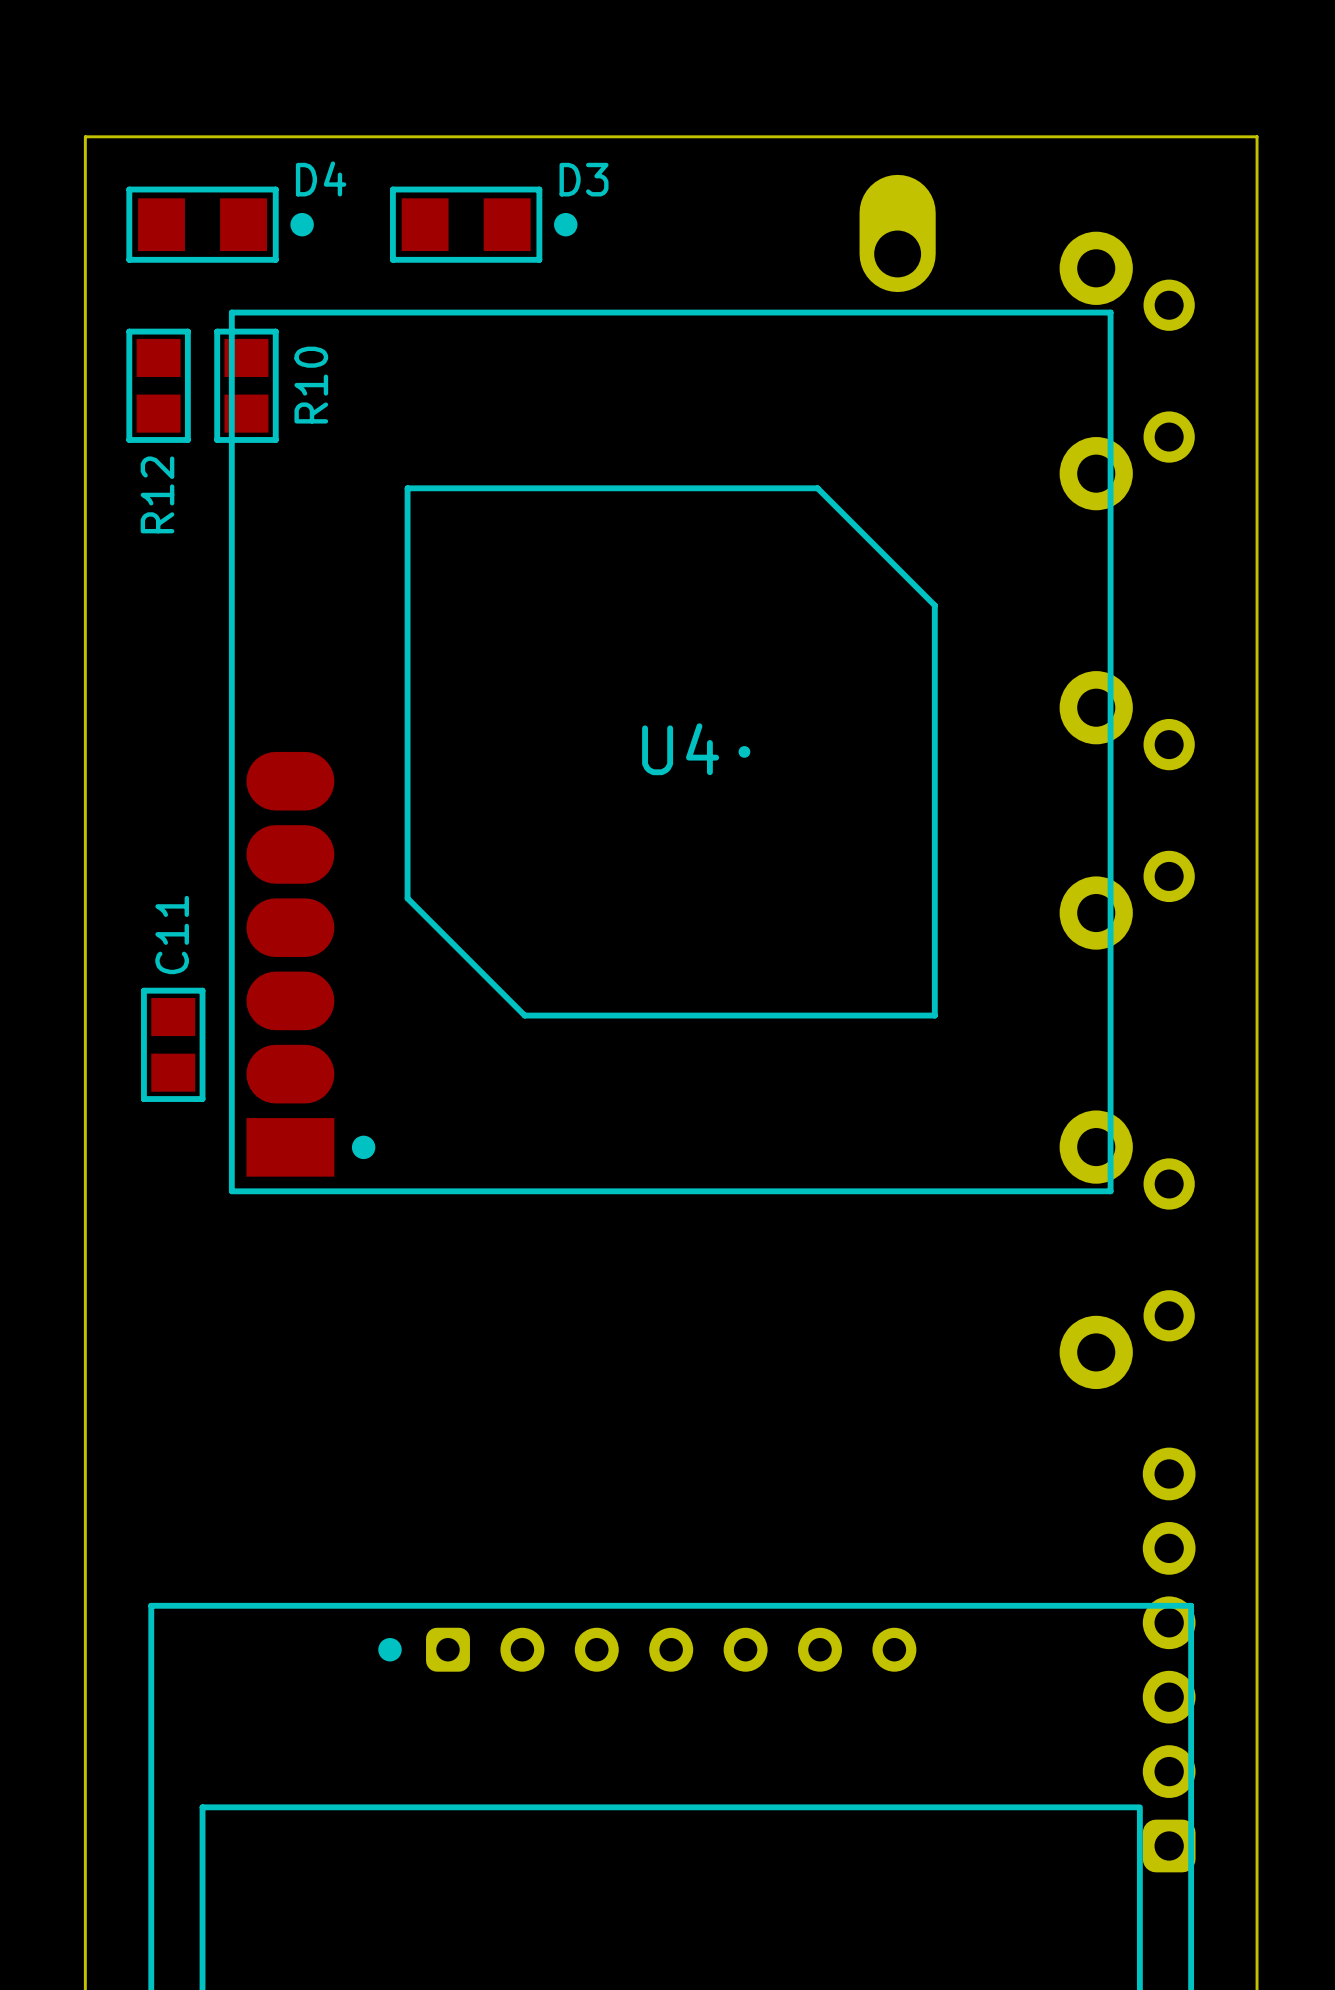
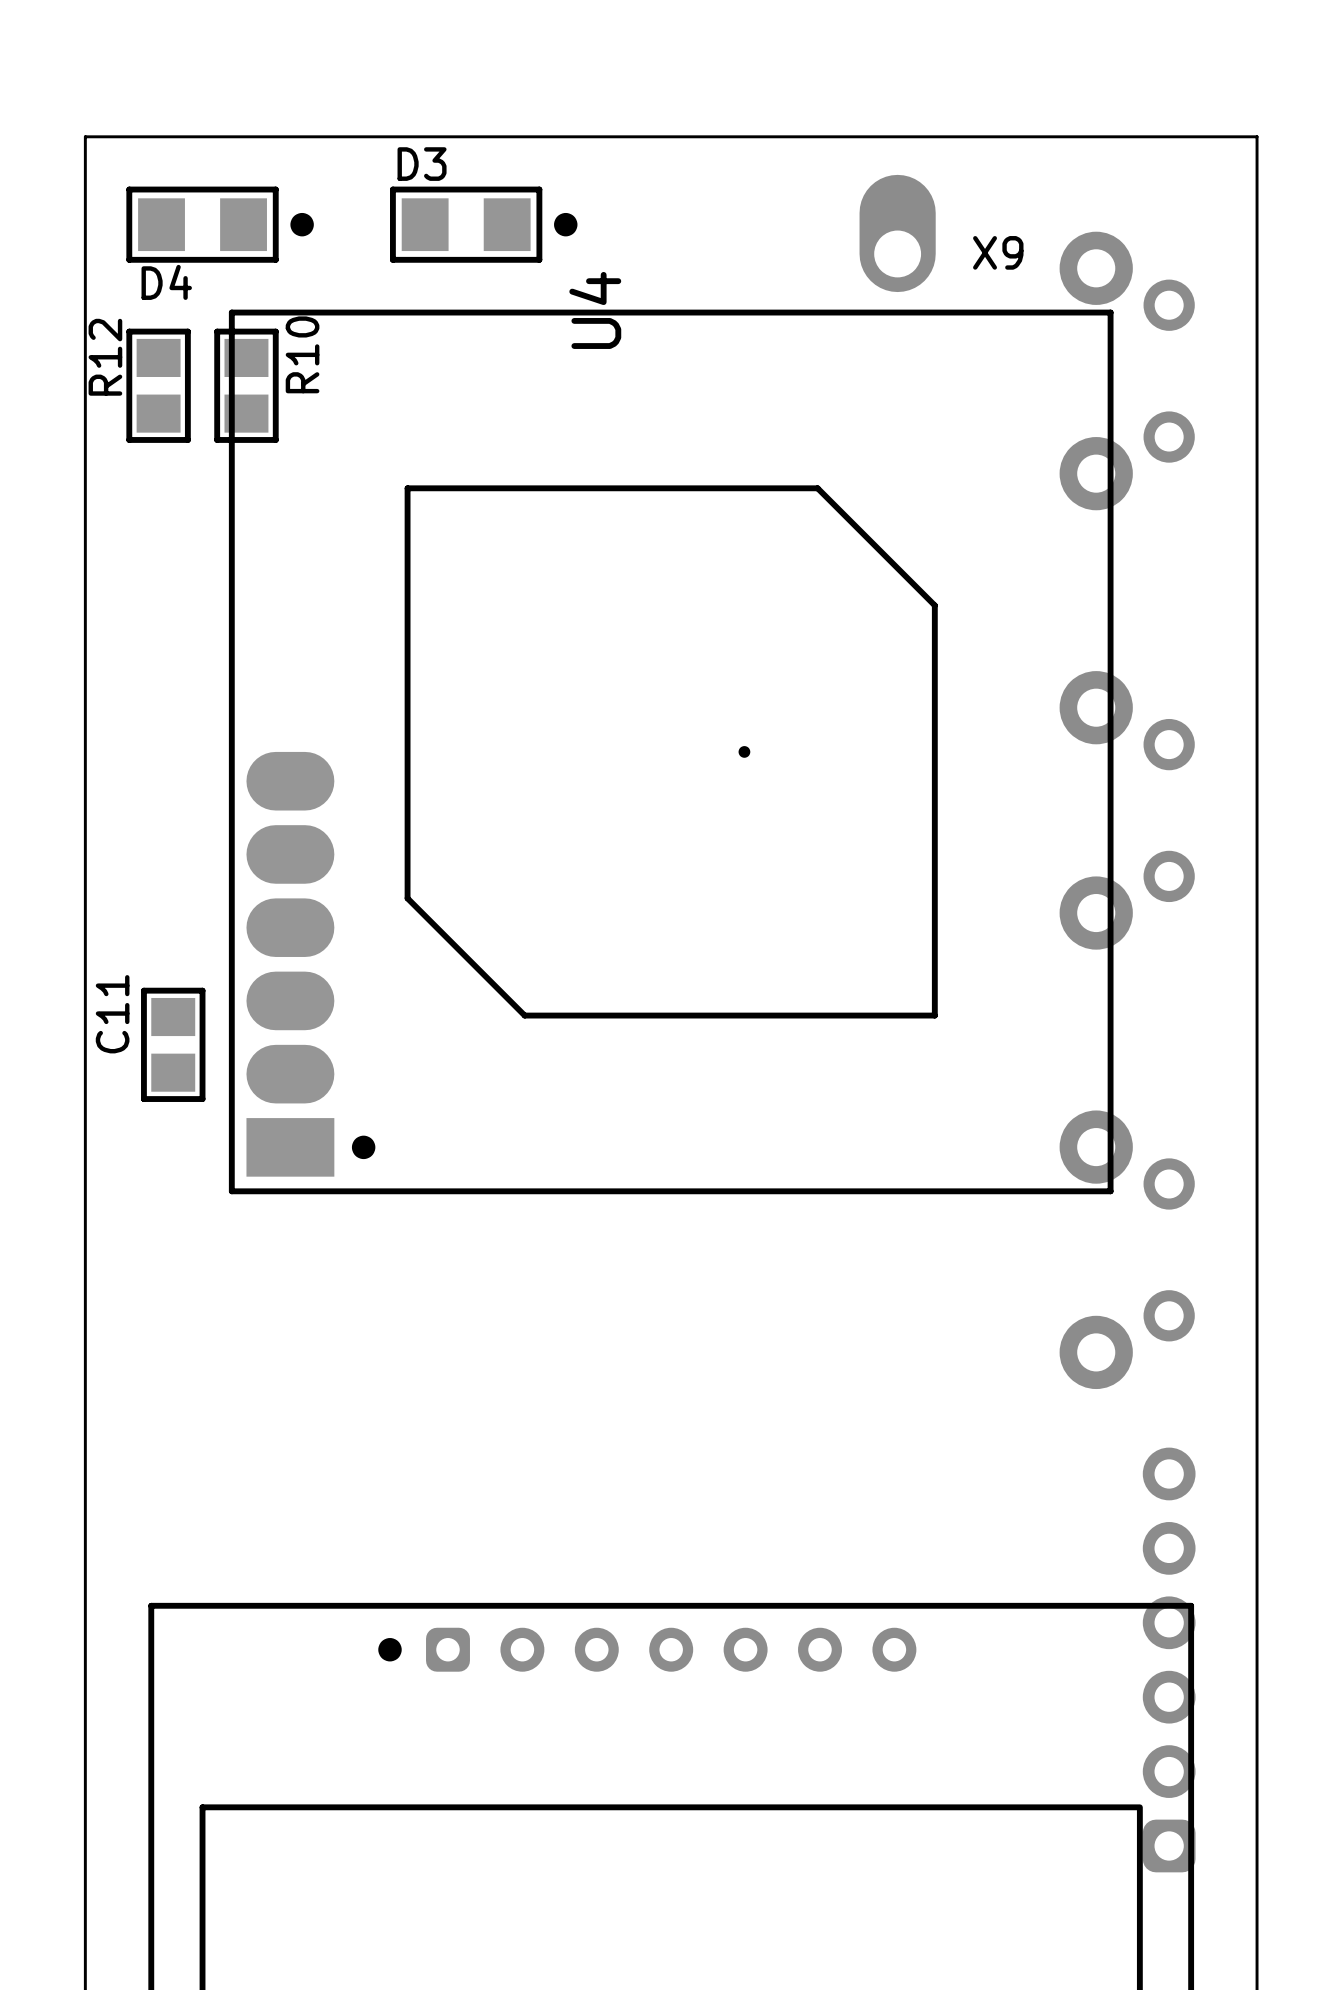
D4 name position: D4 (321, 178) -> D4 (166, 282)
D3 name position: D3 (584, 179) -> D3 (422, 164)
X9 name: none -> X9 (998, 252)
R10 name position: R10 (311, 385) -> R10 (302, 354)
R12 name position: R12 (157, 494) -> R12 (105, 357)
U4 name rotation: 0° (680, 749) -> 90° counterclockwise (595, 310)
U4 name position: U4 (680, 749) -> U4 (595, 310)
C11 name position: C11 (172, 935) -> C11 (112, 1014)

